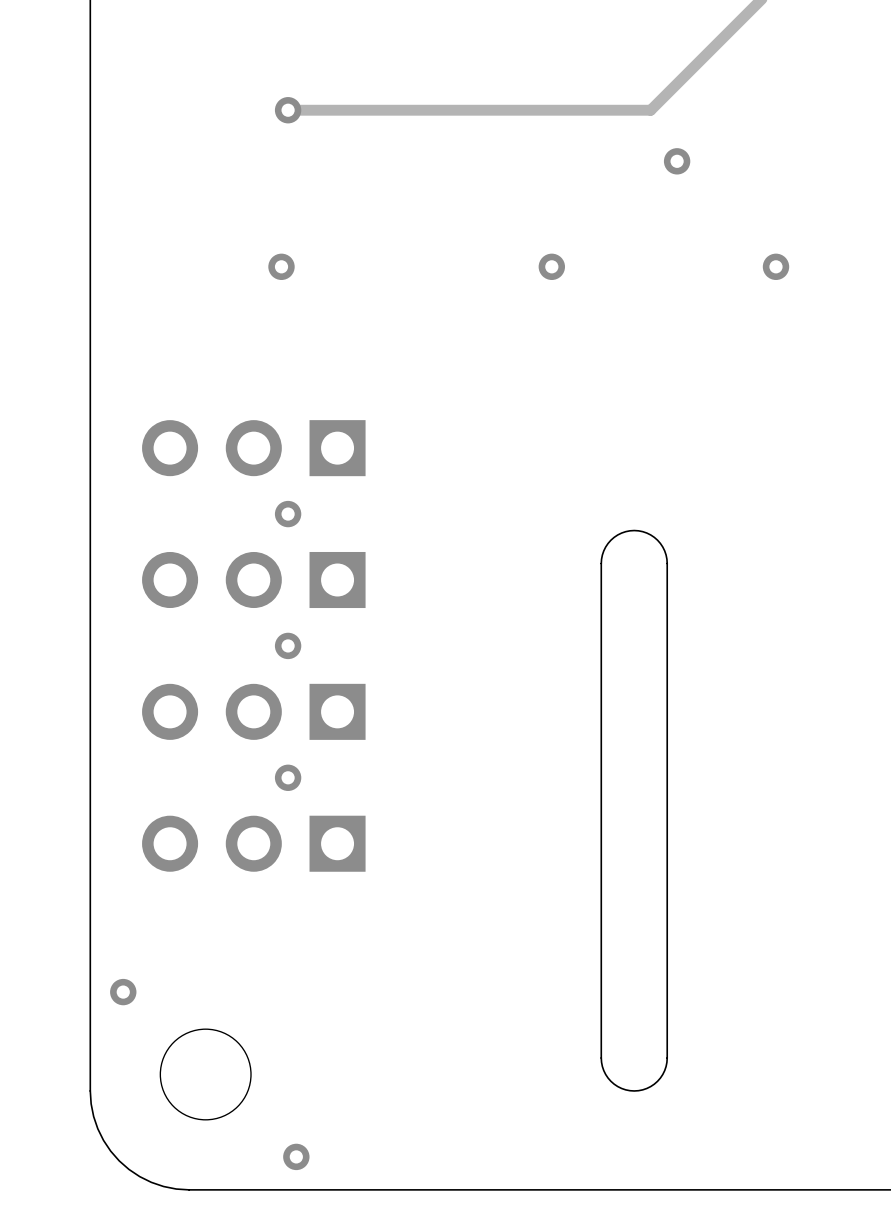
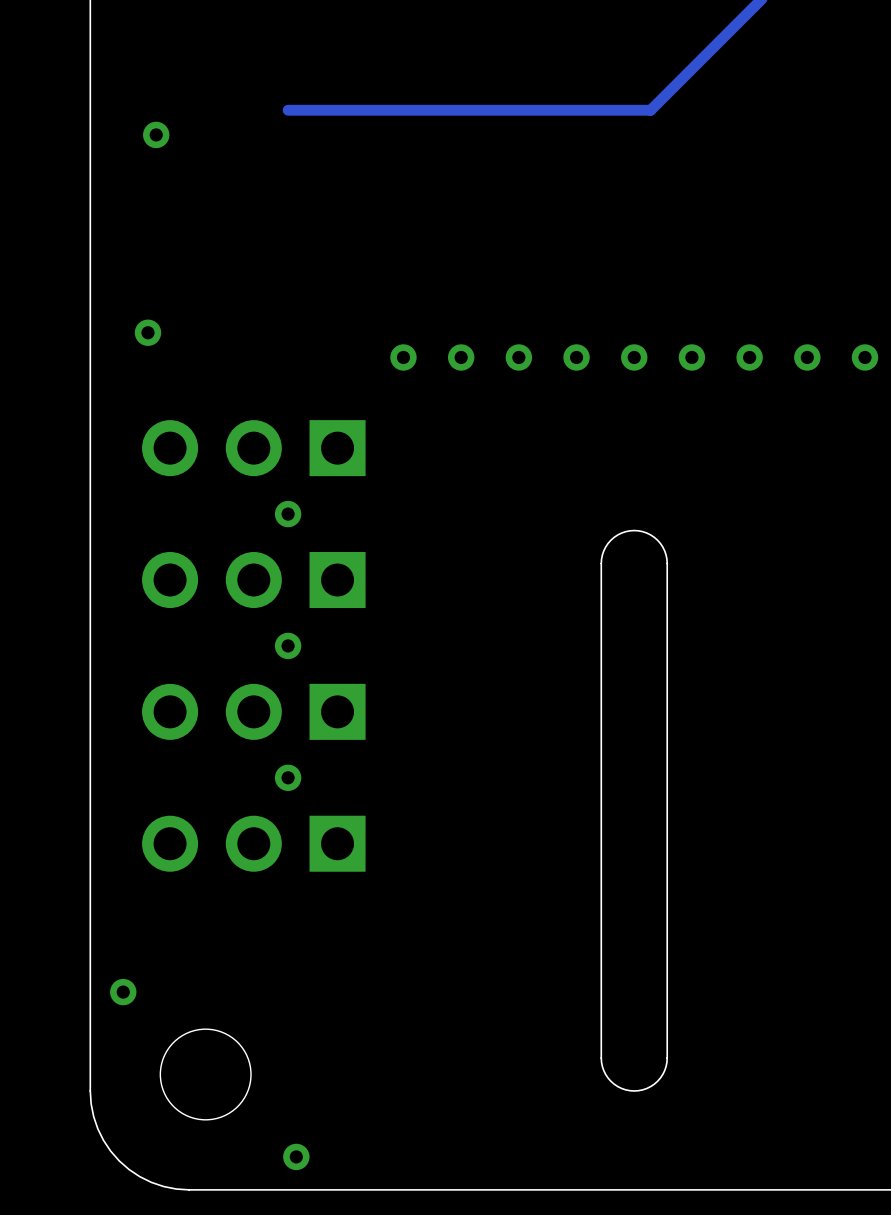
via: (288, 110) -> none
via: none -> (156, 134)
via: (677, 161) -> none
via: (281, 266) -> none
via: (551, 266) -> none
via: (776, 266) -> none
via: none -> (147, 332)
via: none -> (403, 357)
via: none -> (461, 357)
via: none -> (518, 357)
via: none -> (576, 357)
via: none -> (634, 357)
via: none -> (691, 357)
via: none -> (749, 357)
via: none -> (807, 357)
via: none -> (865, 357)

